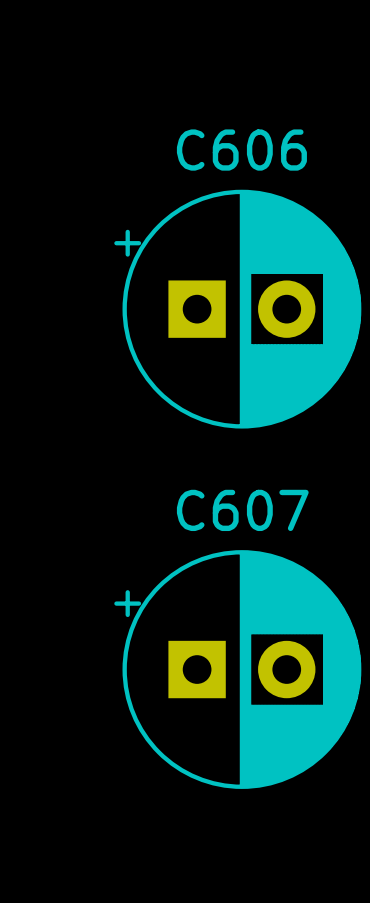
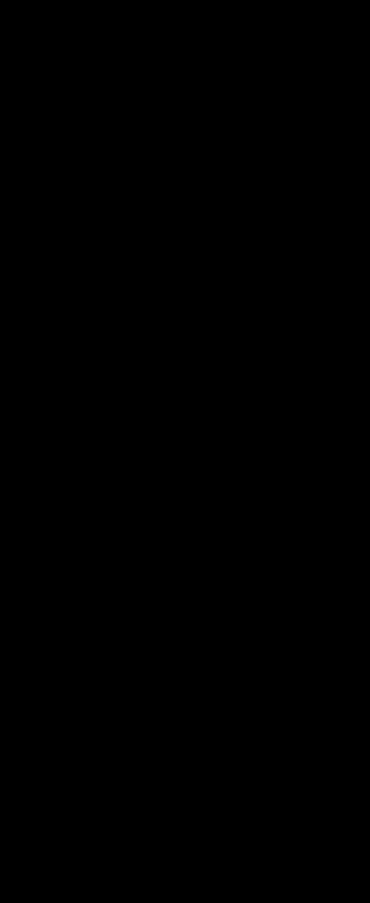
C606: (237, 309) -> none
C607: (237, 669) -> none

